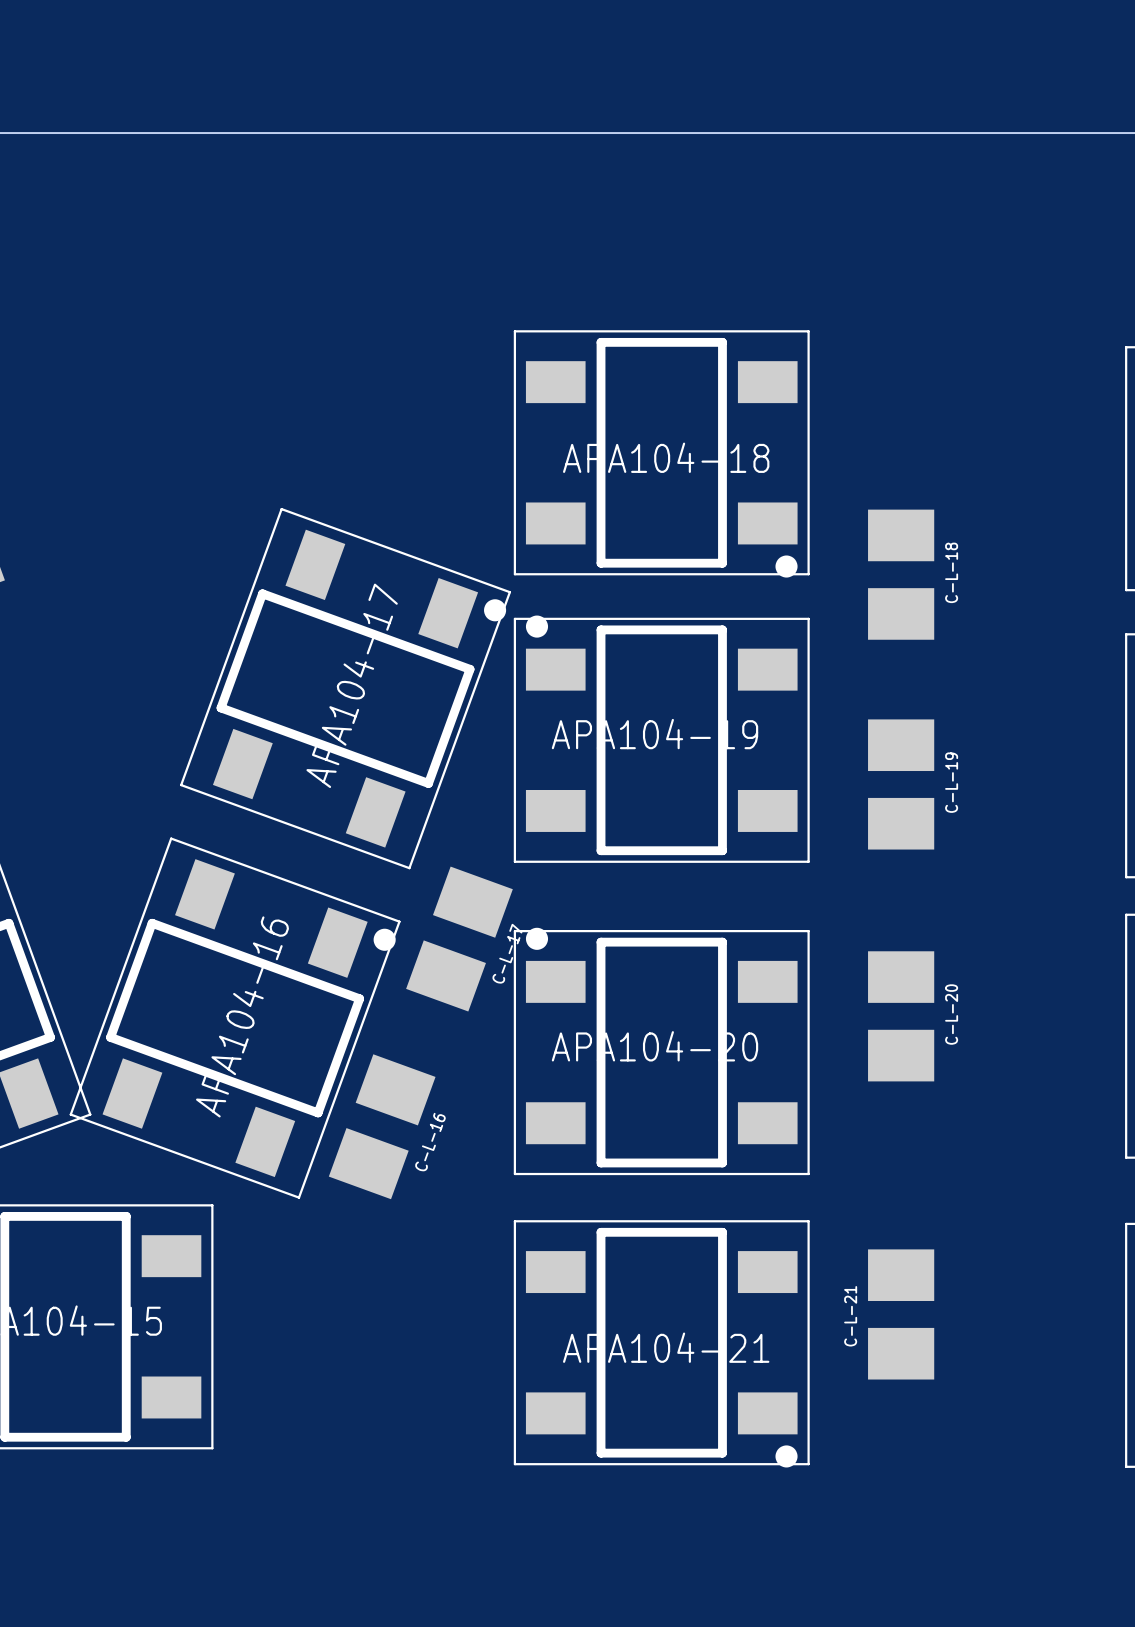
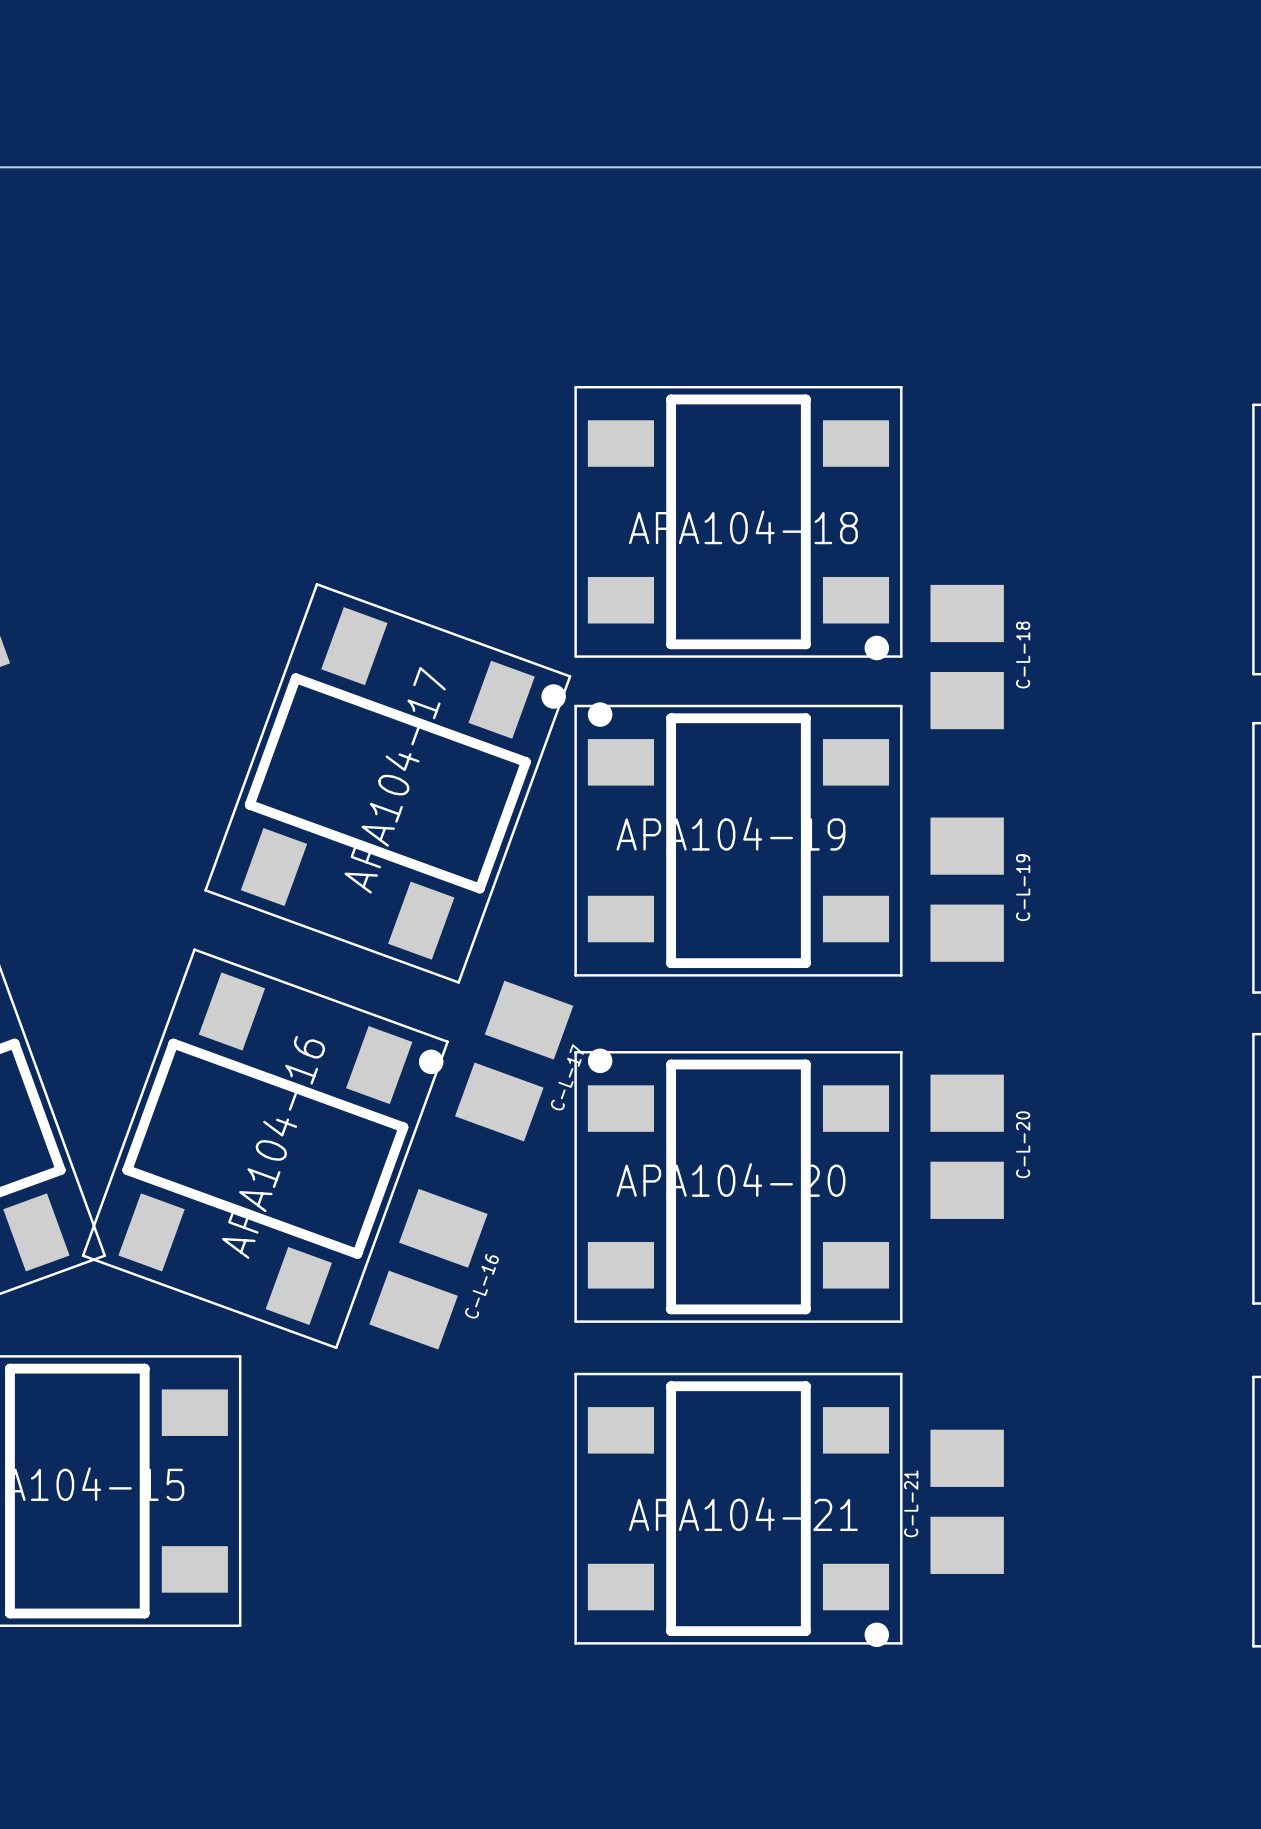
C-L-18 position: (901, 574) -> (967, 657)
C-L-19 position: (901, 784) -> (967, 889)
C-L-20 position: (901, 1016) -> (967, 1146)
C-L-21 position: (901, 1314) -> (967, 1501)

